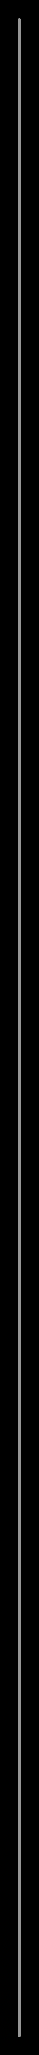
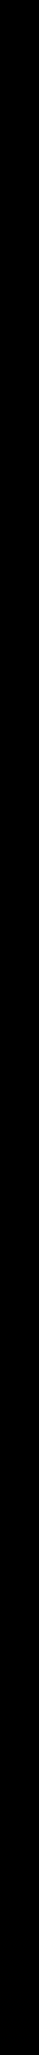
line: (19, 19) (19, 2036) -> none

